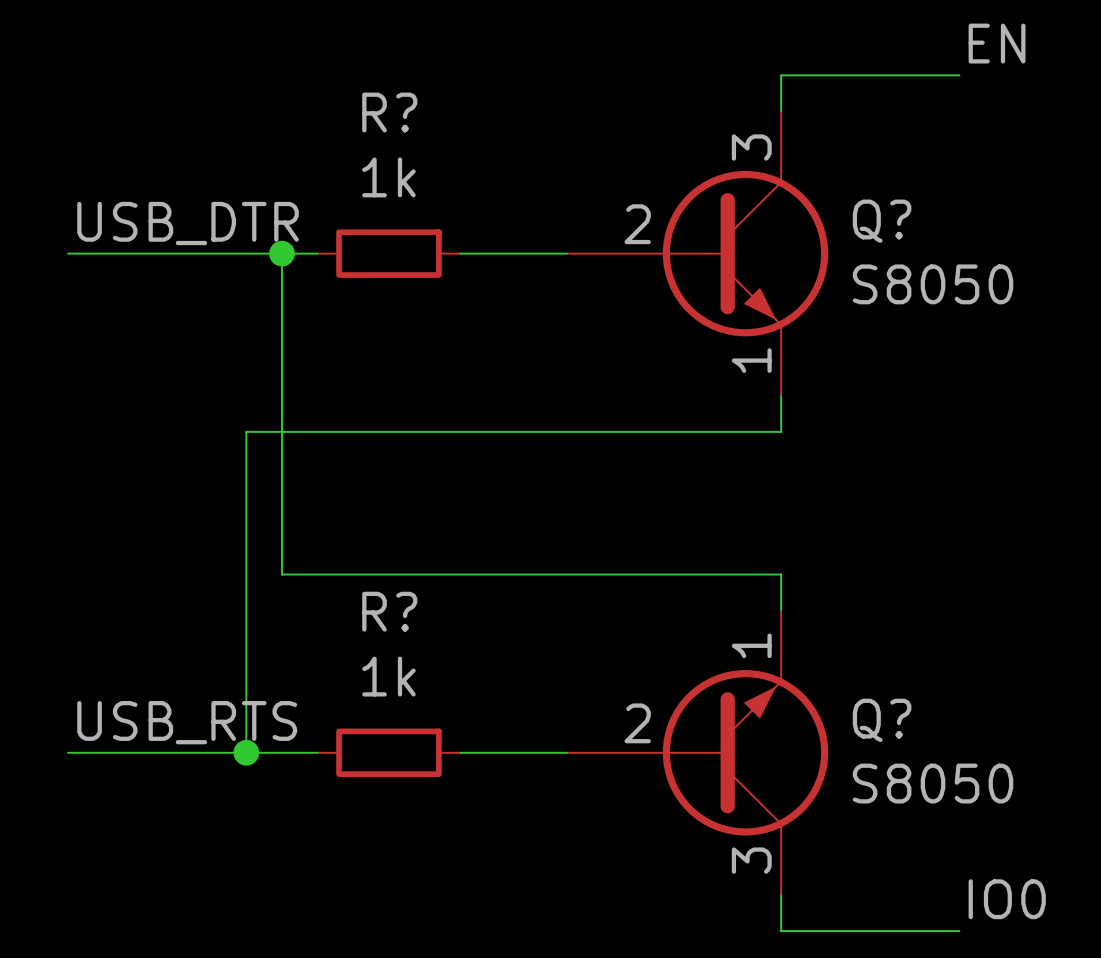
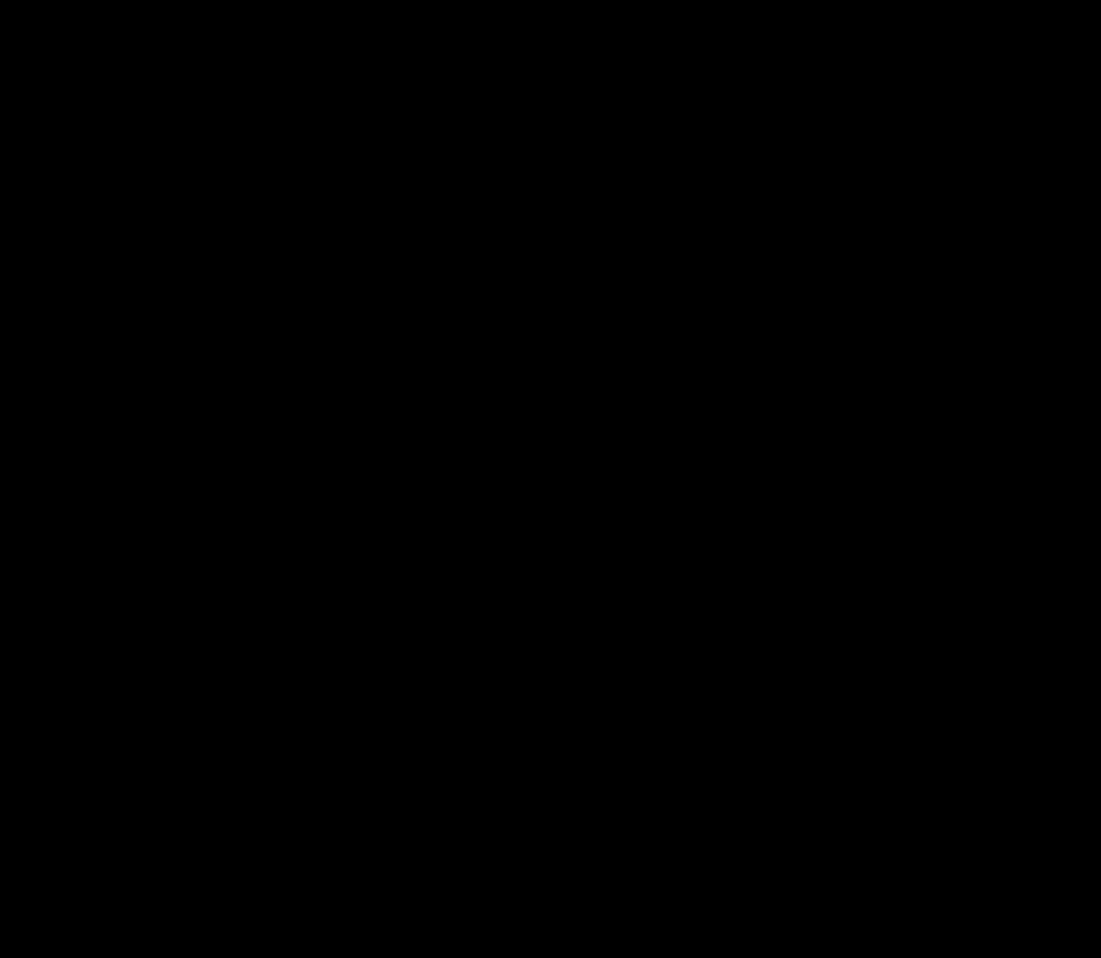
label: EN (997, 43) -> none
wire: (959, 75) (781, 75) (781, 111) -> none
label: USB_DTR (188, 223) -> none
wire: (68, 253) (317, 253) -> none
wire: (281, 253) (281, 574) (781, 574) (781, 610) -> none
junction: (281, 253) -> none
R?: 1k (388, 253) -> none
wire: (460, 253) (567, 253) -> none
Q?: S8050 (697, 253) -> none
wire: (781, 396) (781, 431) (246, 431) (246, 752) -> none
label: USB_RTS (187, 722) -> none
wire: (68, 752) (317, 752) -> none
junction: (246, 752) -> none
R?: 1k (388, 752) -> none
wire: (460, 752) (567, 752) -> none
Q?: S8050 (697, 752) -> none
wire: (781, 895) (781, 931) (959, 931) -> none
label: IO0 (1007, 899) -> none

